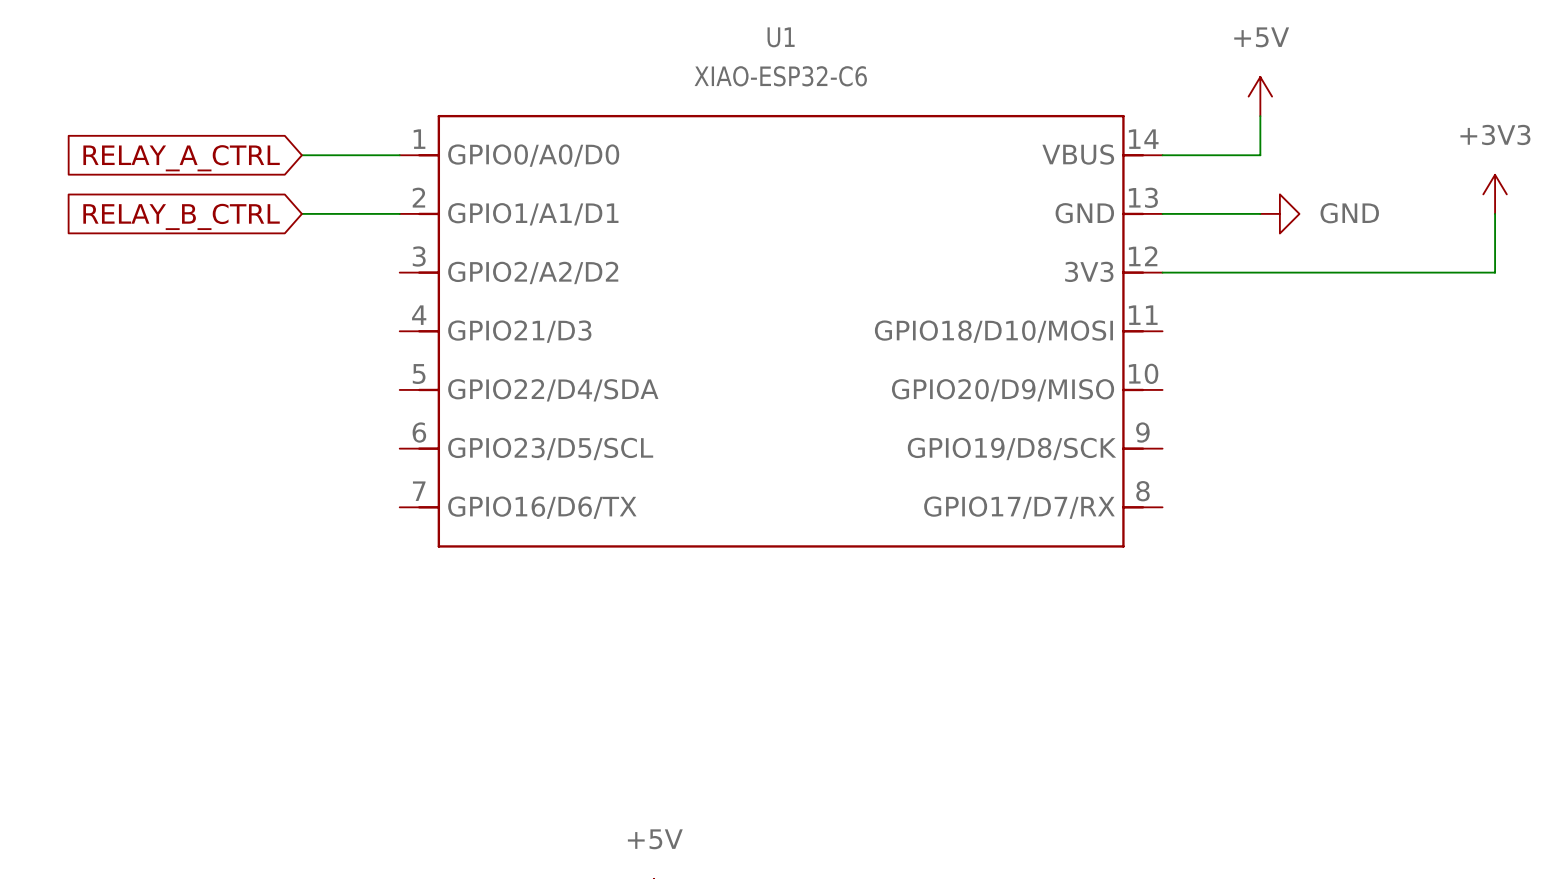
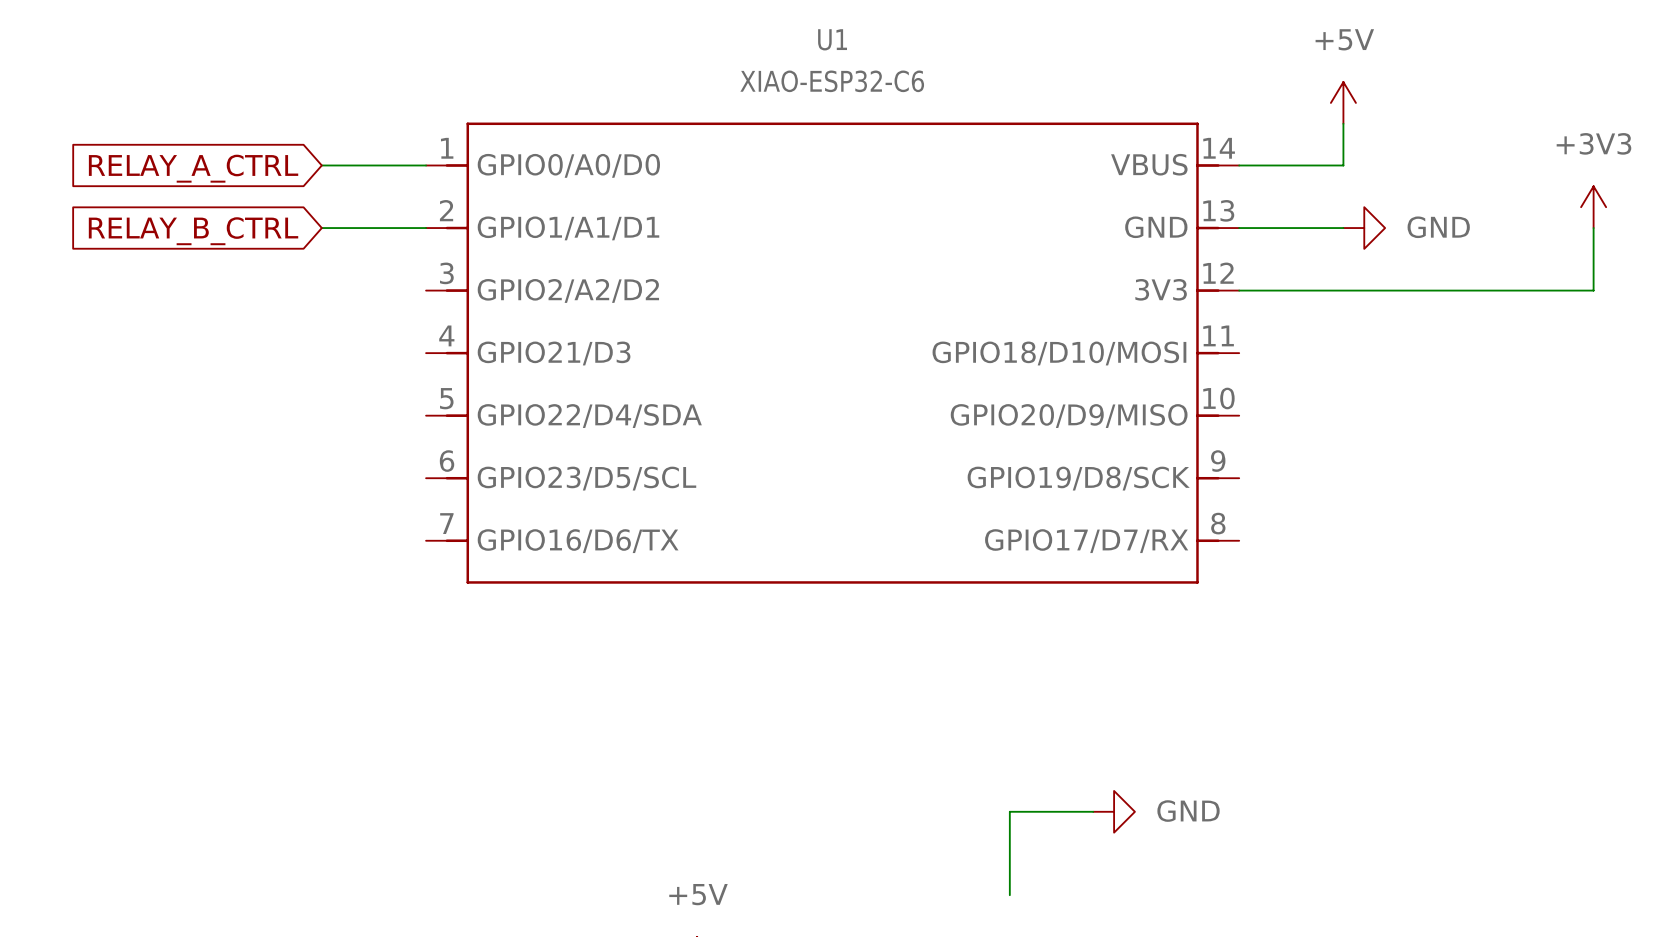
wire: none -> (1093, 811) (1009, 811) (1009, 895)
power symbol: none -> GND (1114, 811)

